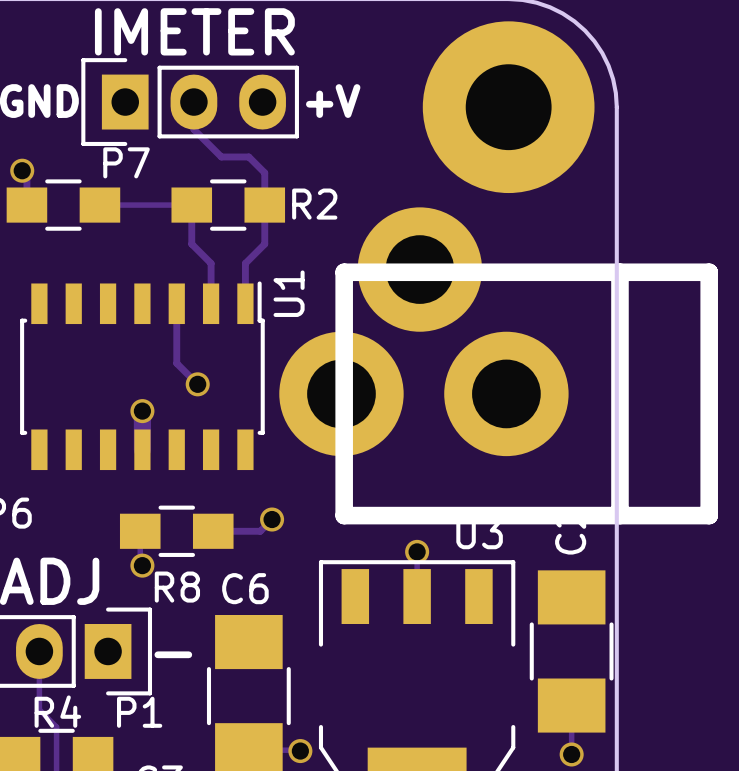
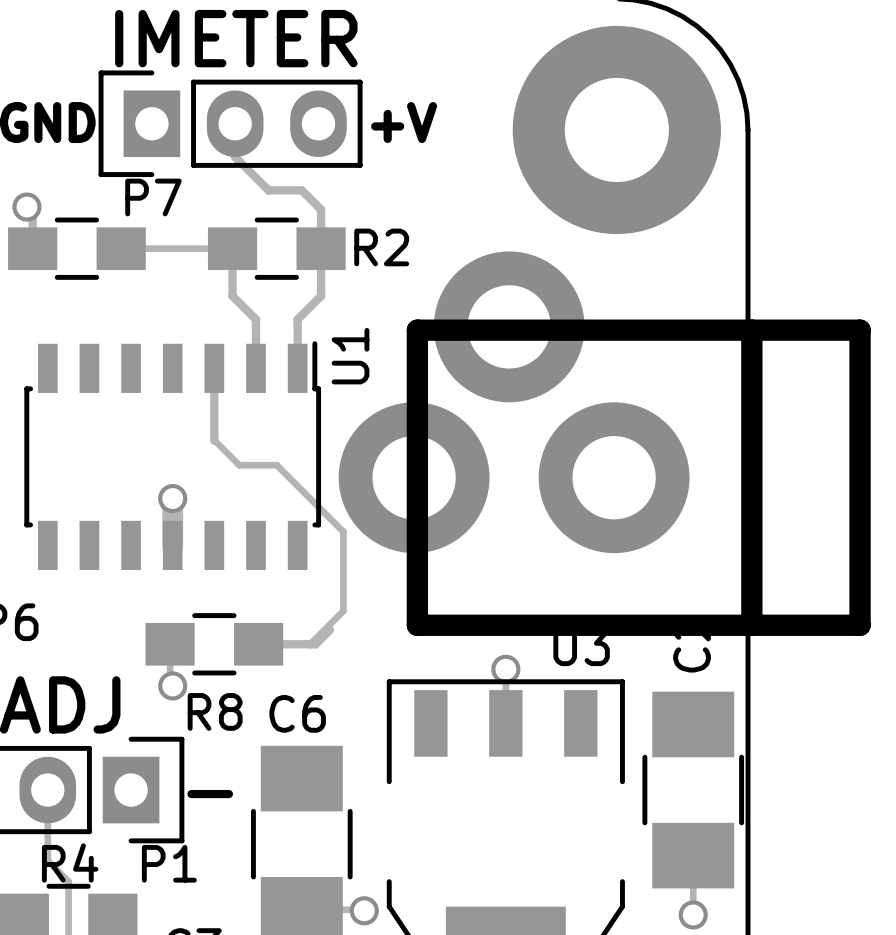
track: (176, 363) (197, 384) -> (214, 440) (239, 465) (276, 465) (343, 531) (343, 610) (310, 644)
via: (197, 384) -> none
via: (272, 519) -> none

